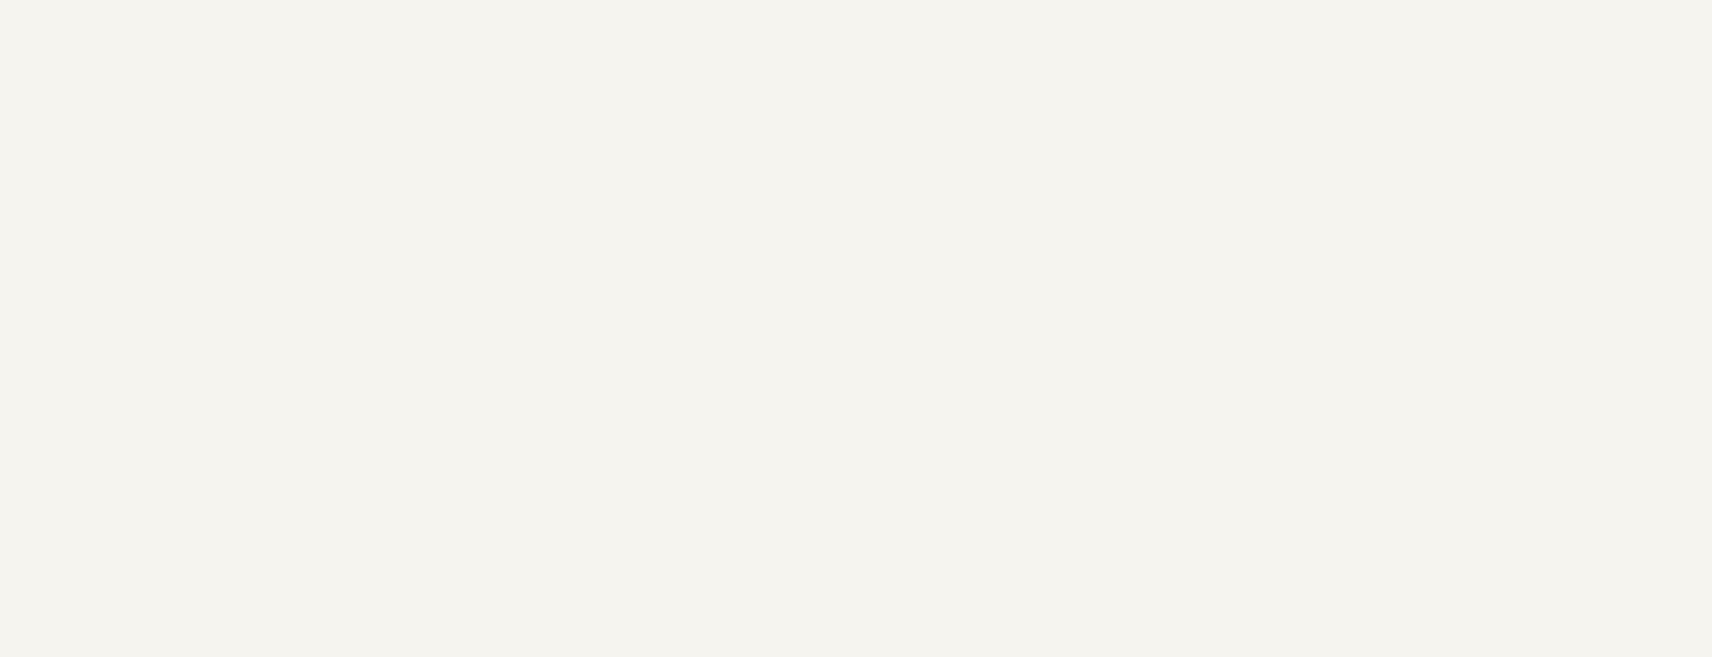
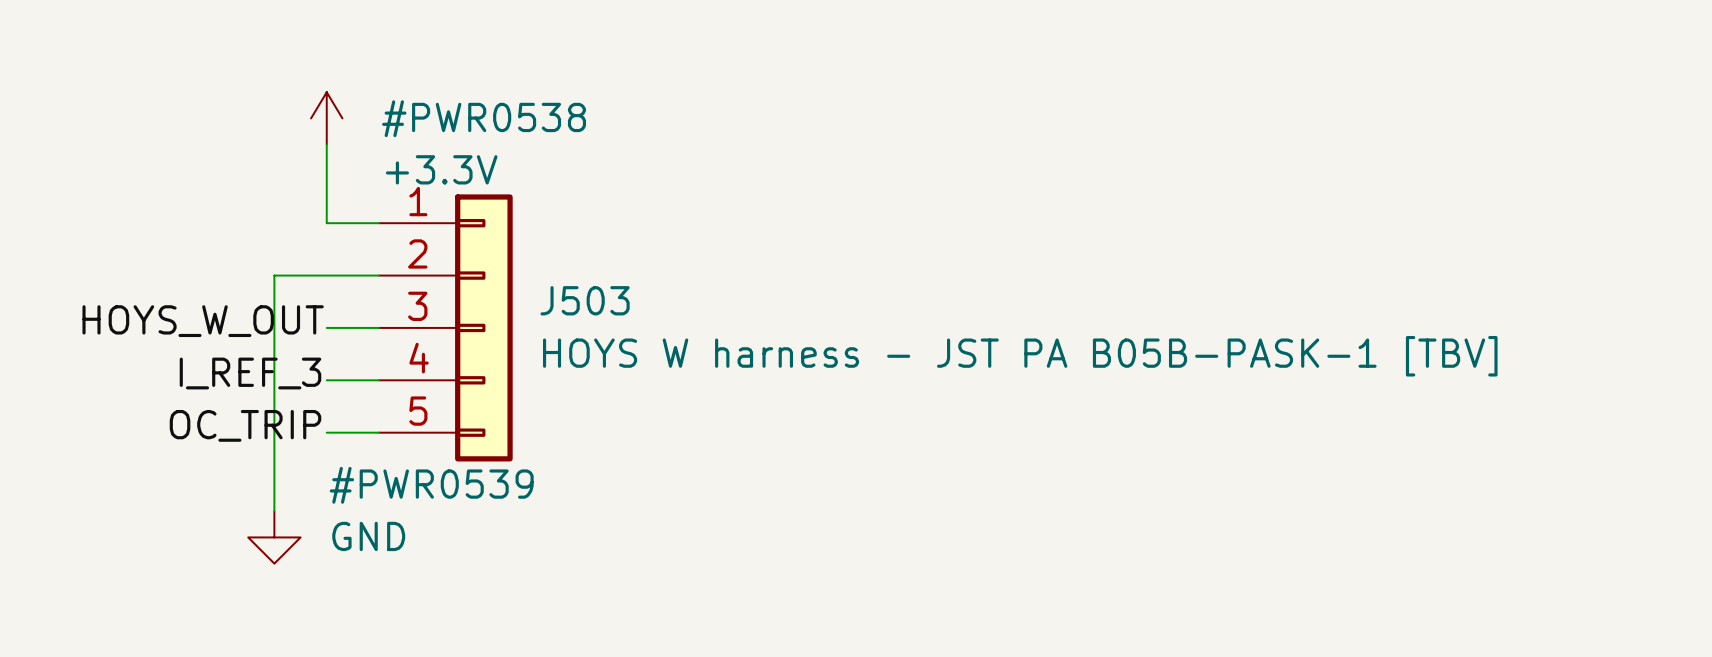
#PWR0538: none -> +3.3V (326, 118)
wire: none -> (326, 144) (326, 223) (379, 223)
wire: none -> (379, 275) (274, 275) (274, 511)
label: none -> HOYS_W_OUT (203, 321)
wire: none -> (326, 327) (379, 327)
J503: none -> HOYS W harness - JST PA B05B-PASK-1 [TBV] (445, 327)
label: none -> I_REF_3 (250, 373)
wire: none -> (326, 380) (379, 380)
label: none -> OC_TRIP (245, 425)
wire: none -> (326, 432) (379, 432)
#PWR0539: none -> GND (274, 537)

